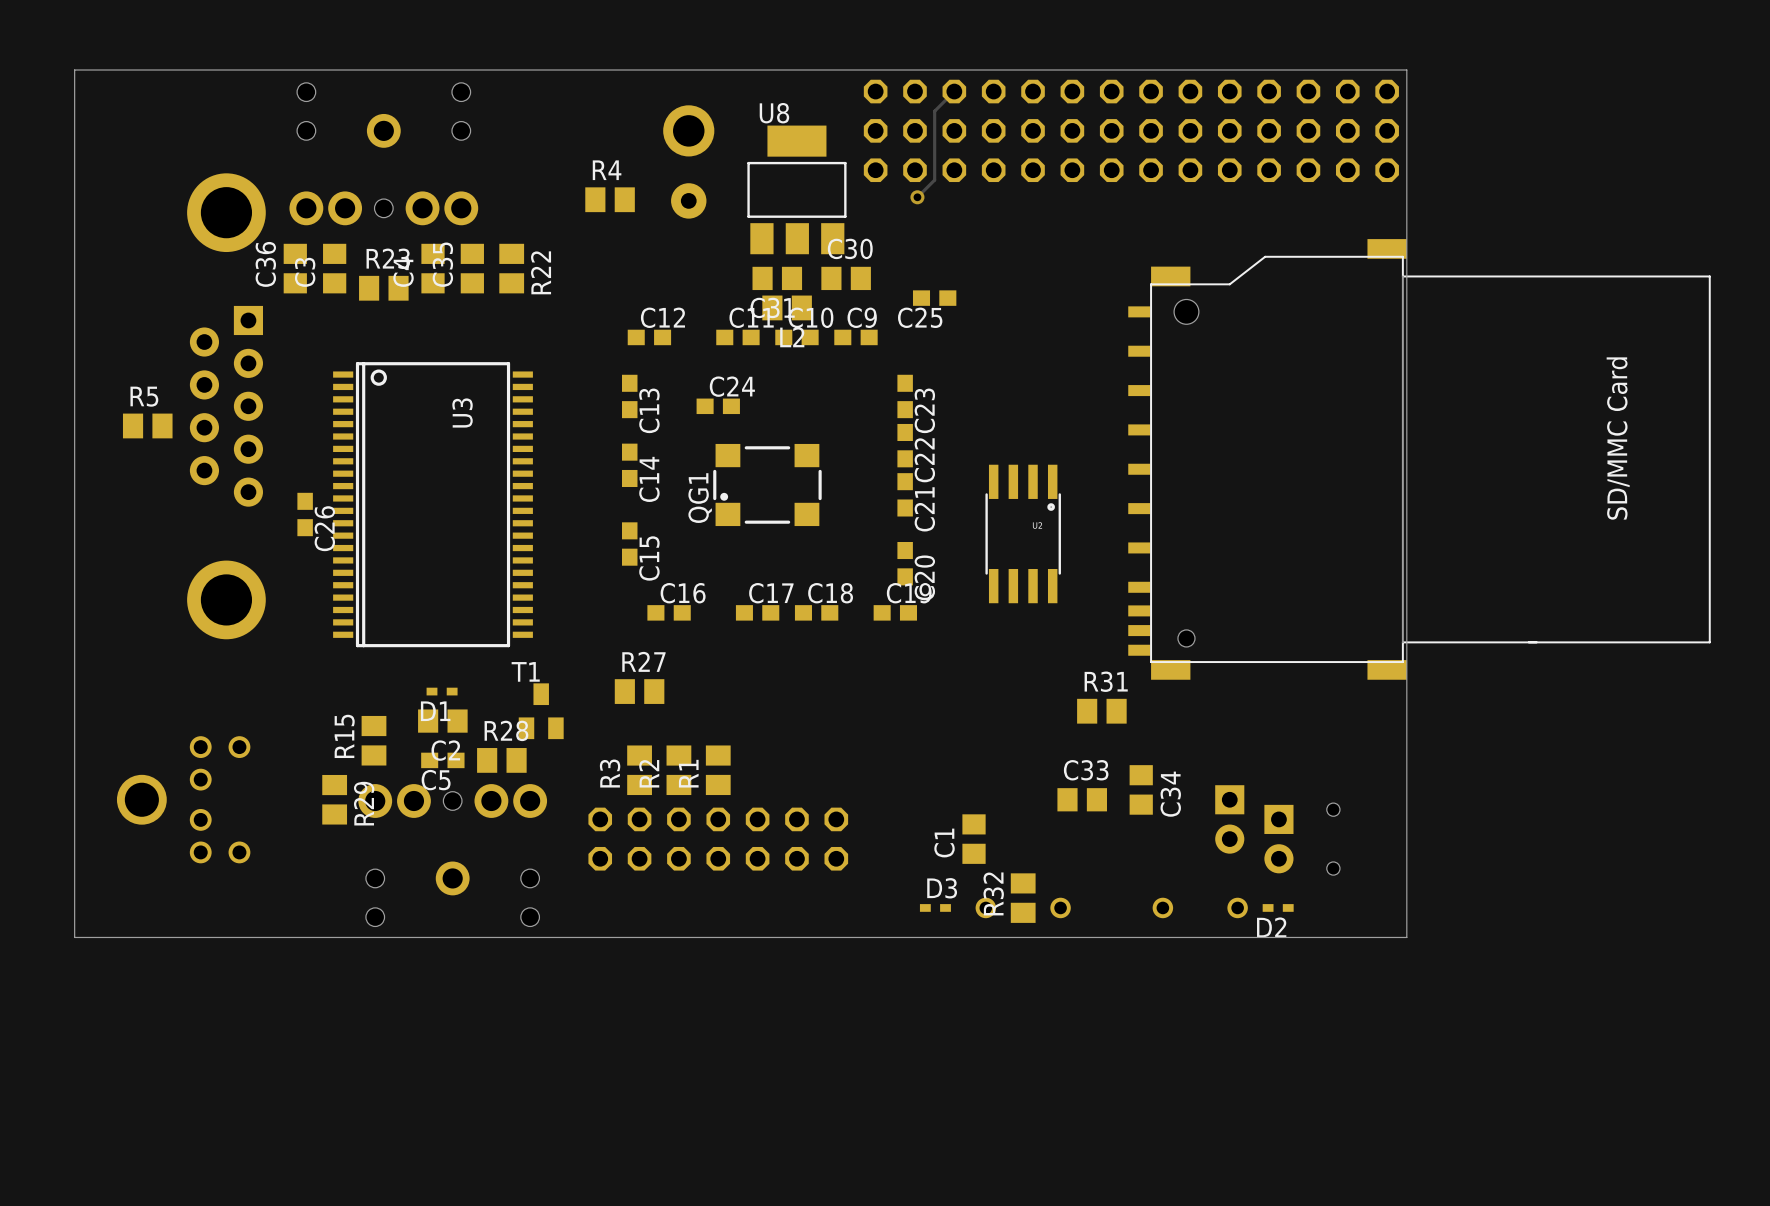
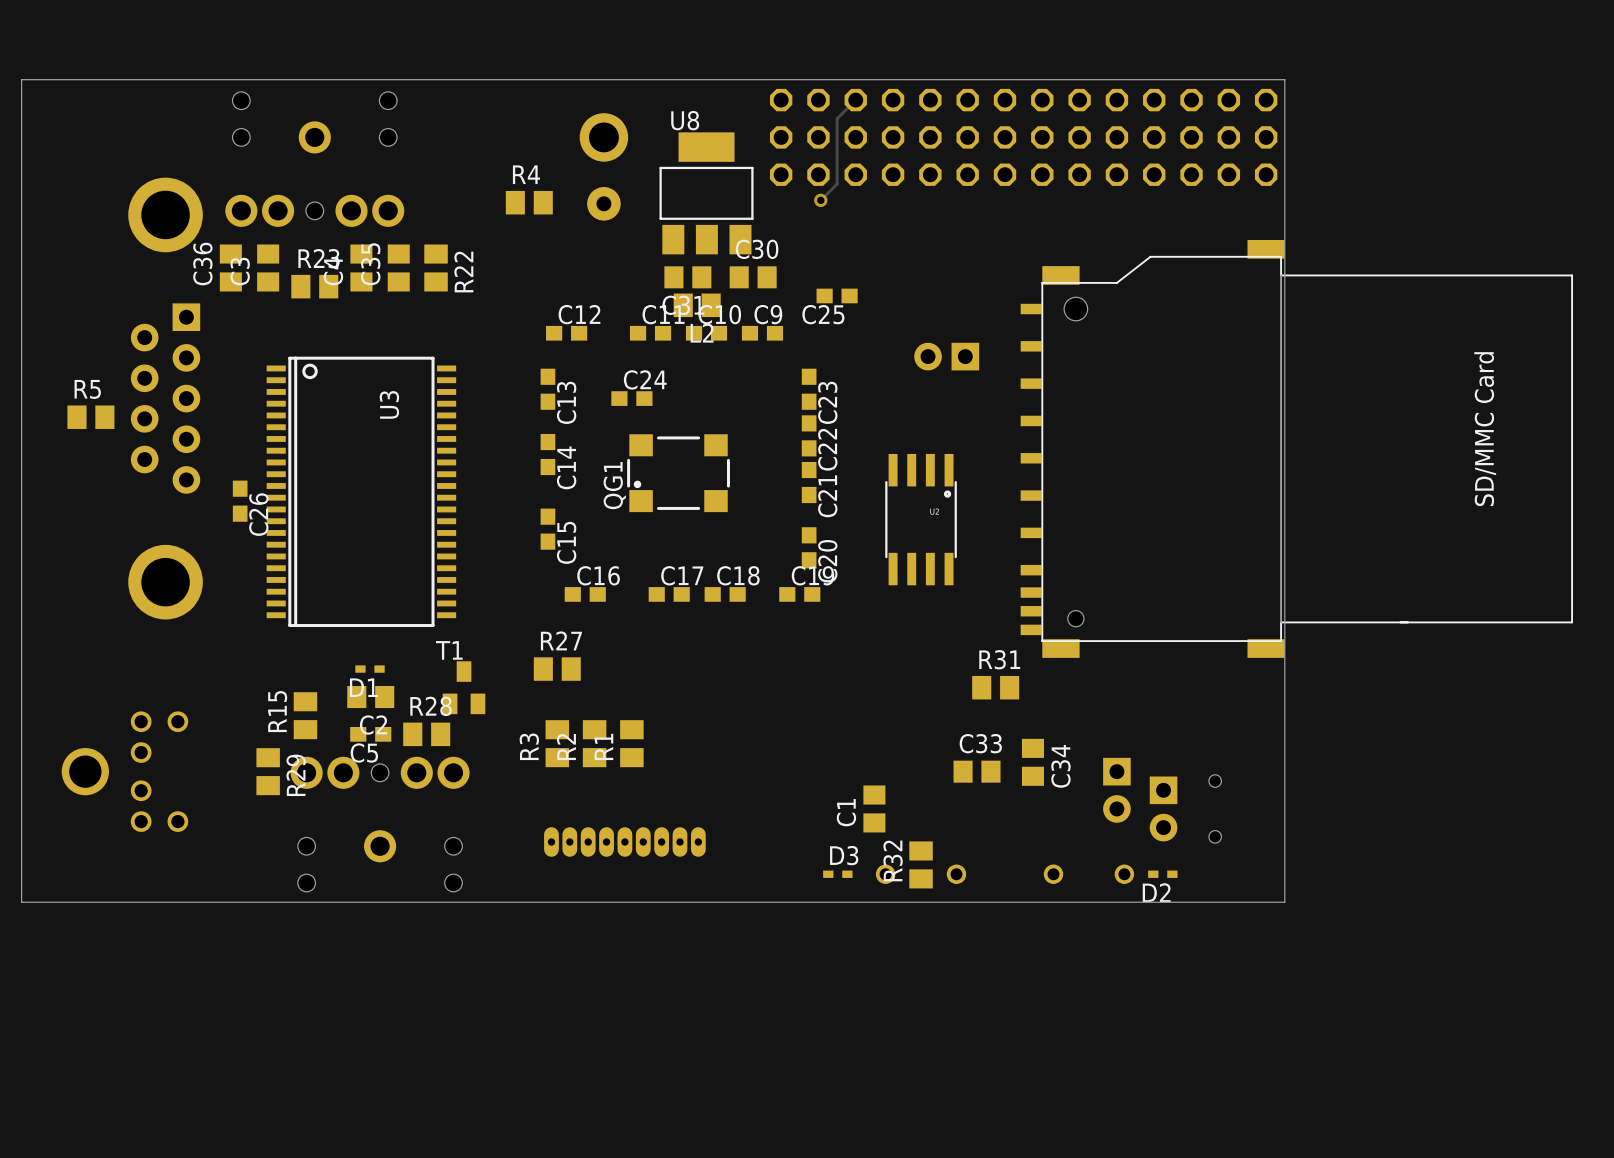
part: none -> (946, 356)
part: (718, 839) -> none
part: none -> (624, 841)

